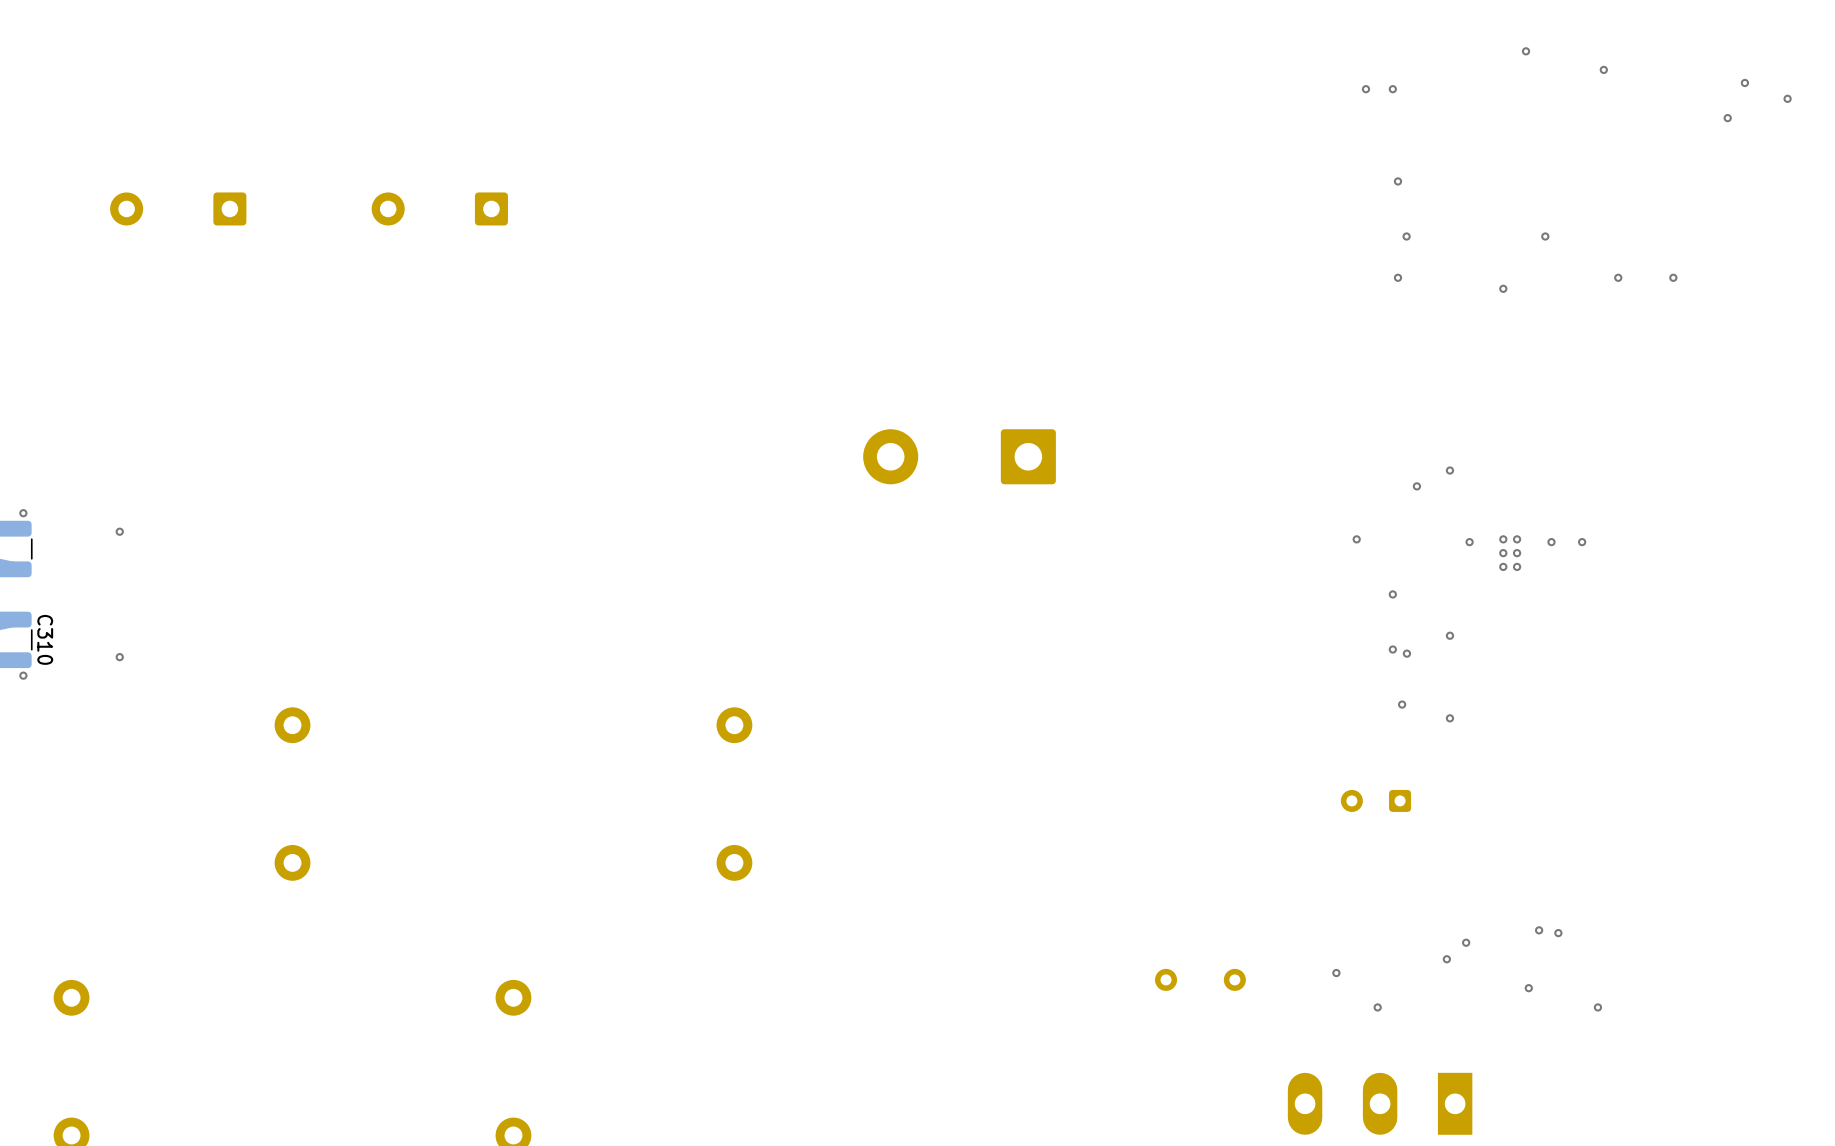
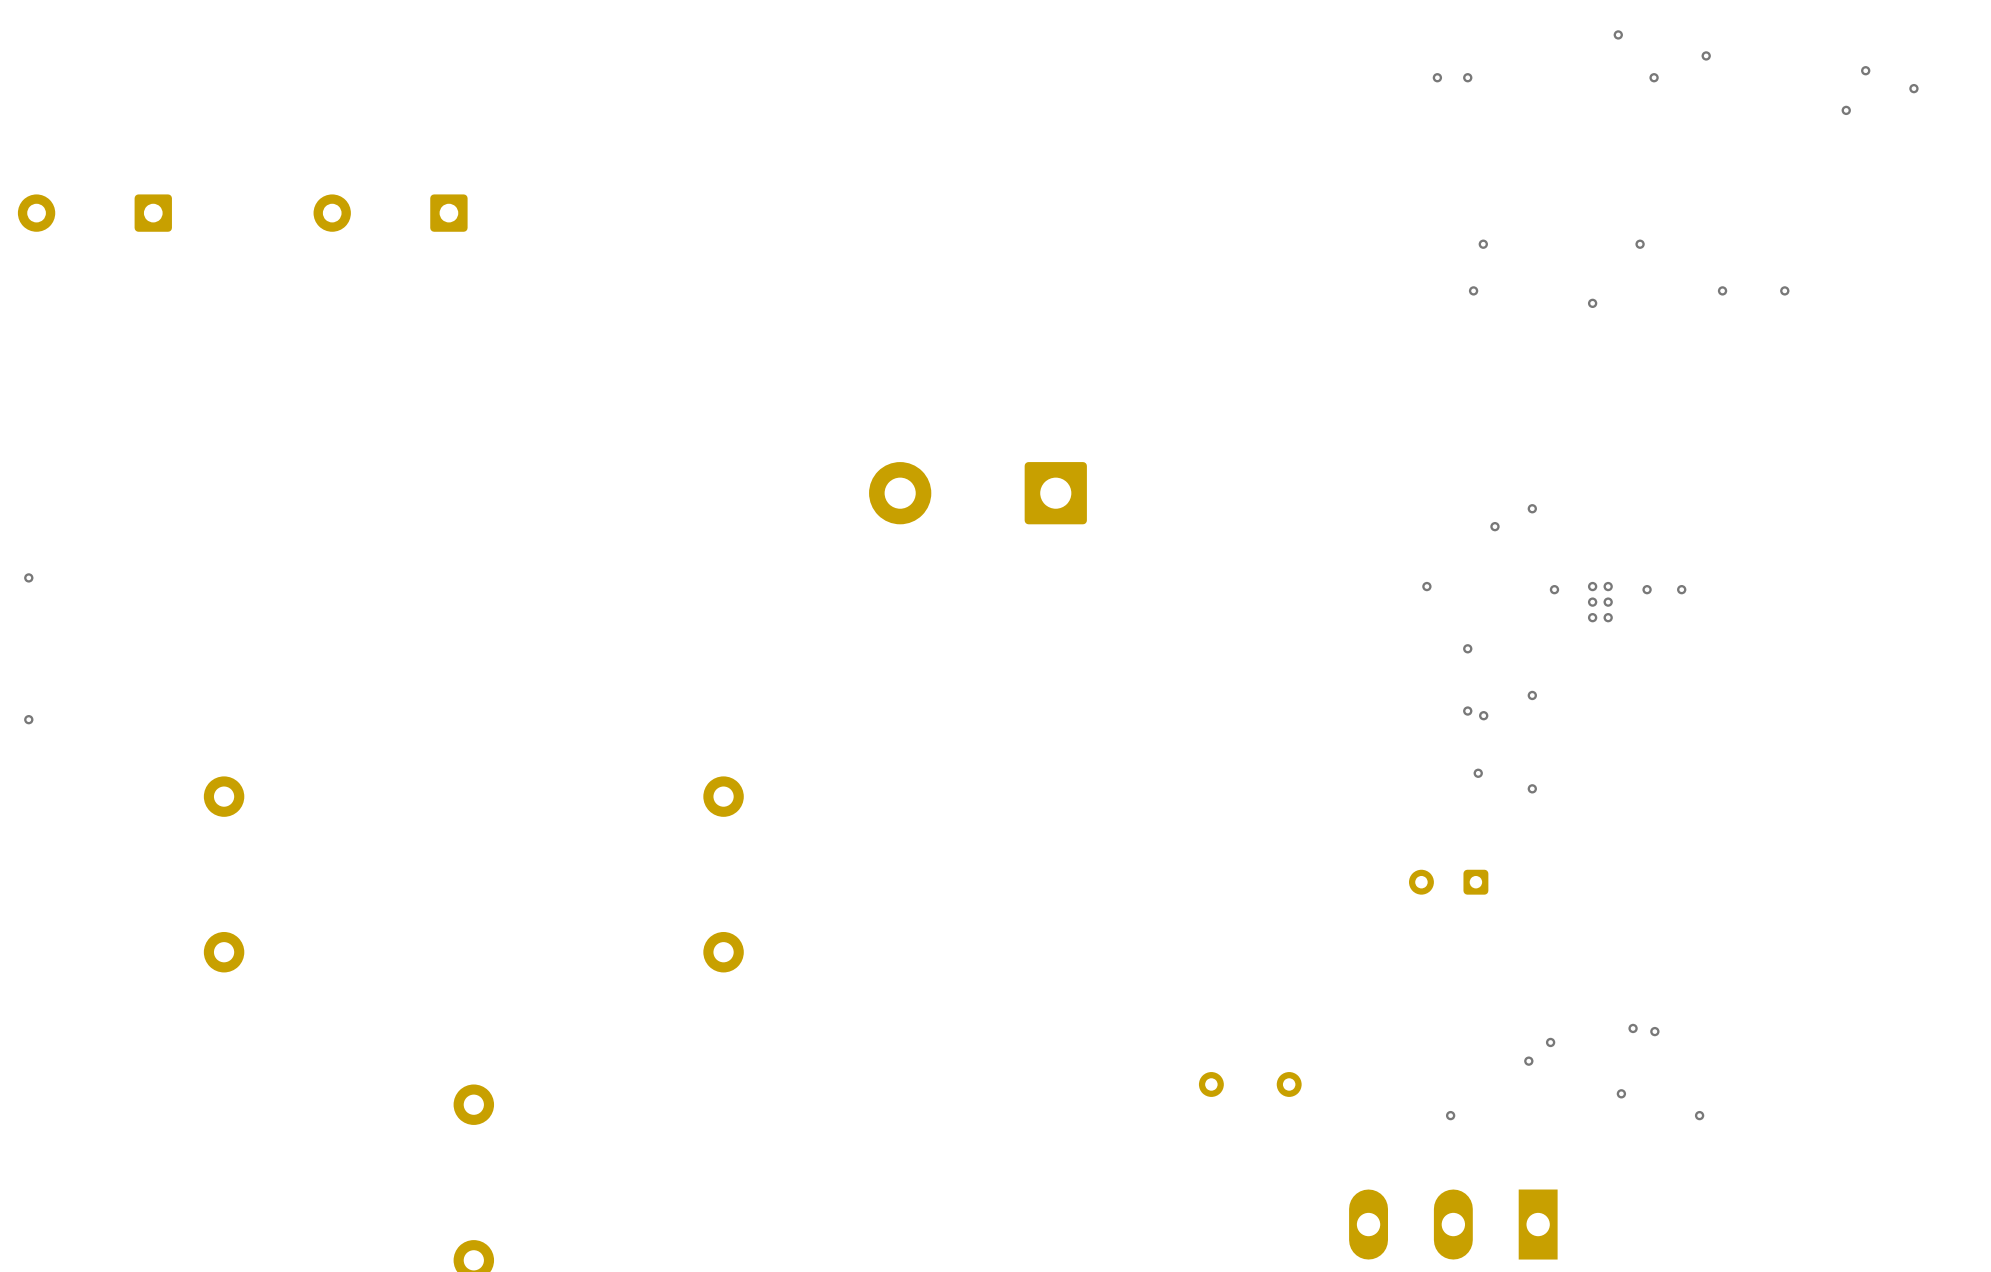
via: none -> (1654, 77)
via: (1397, 181) -> none
via: (1336, 973) -> none

